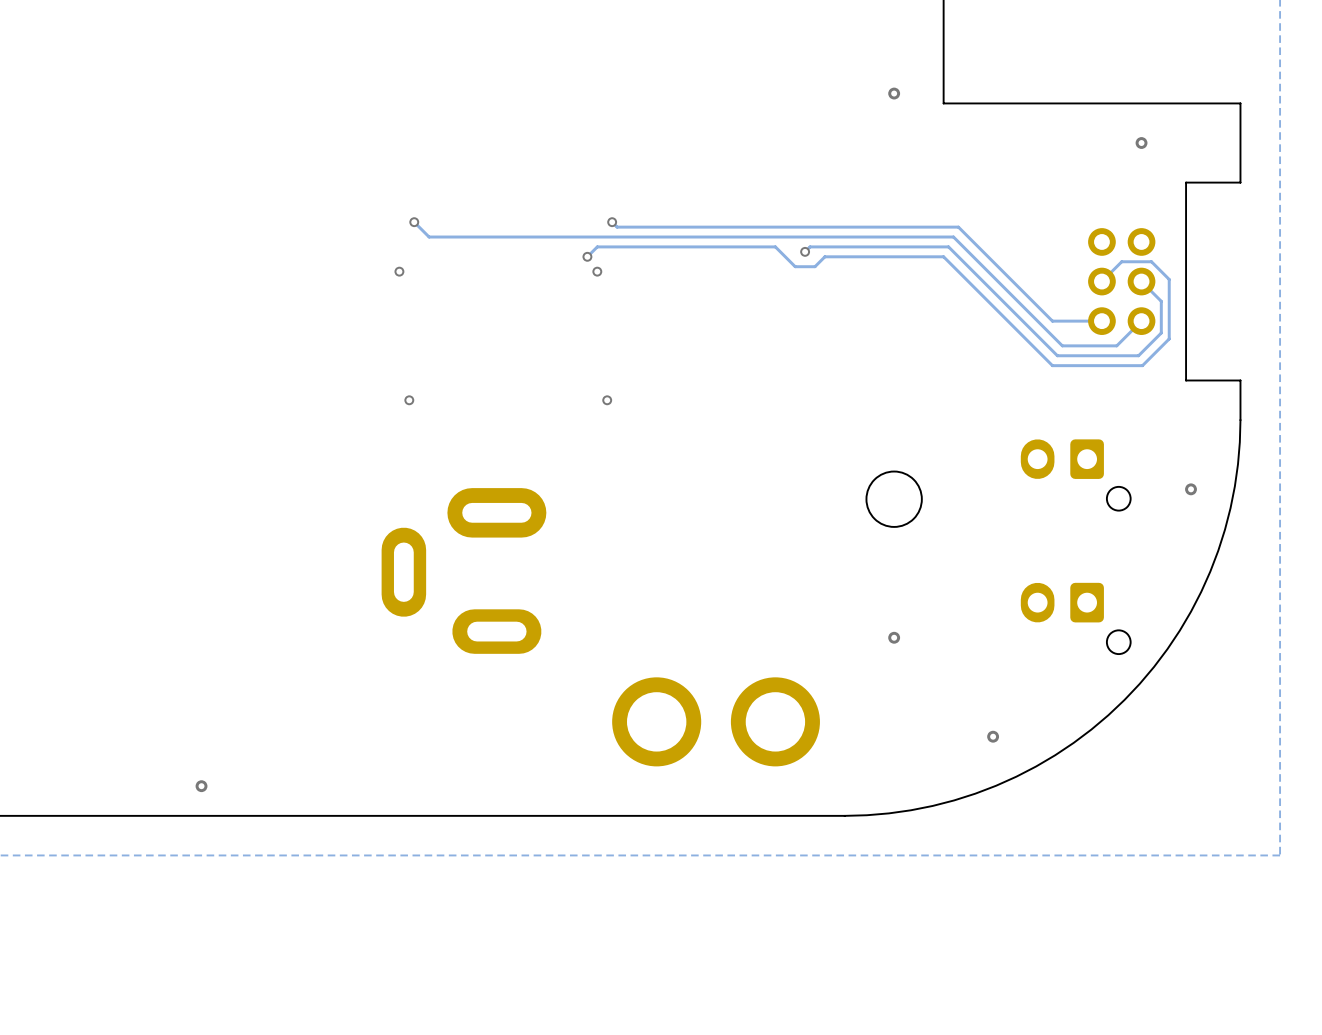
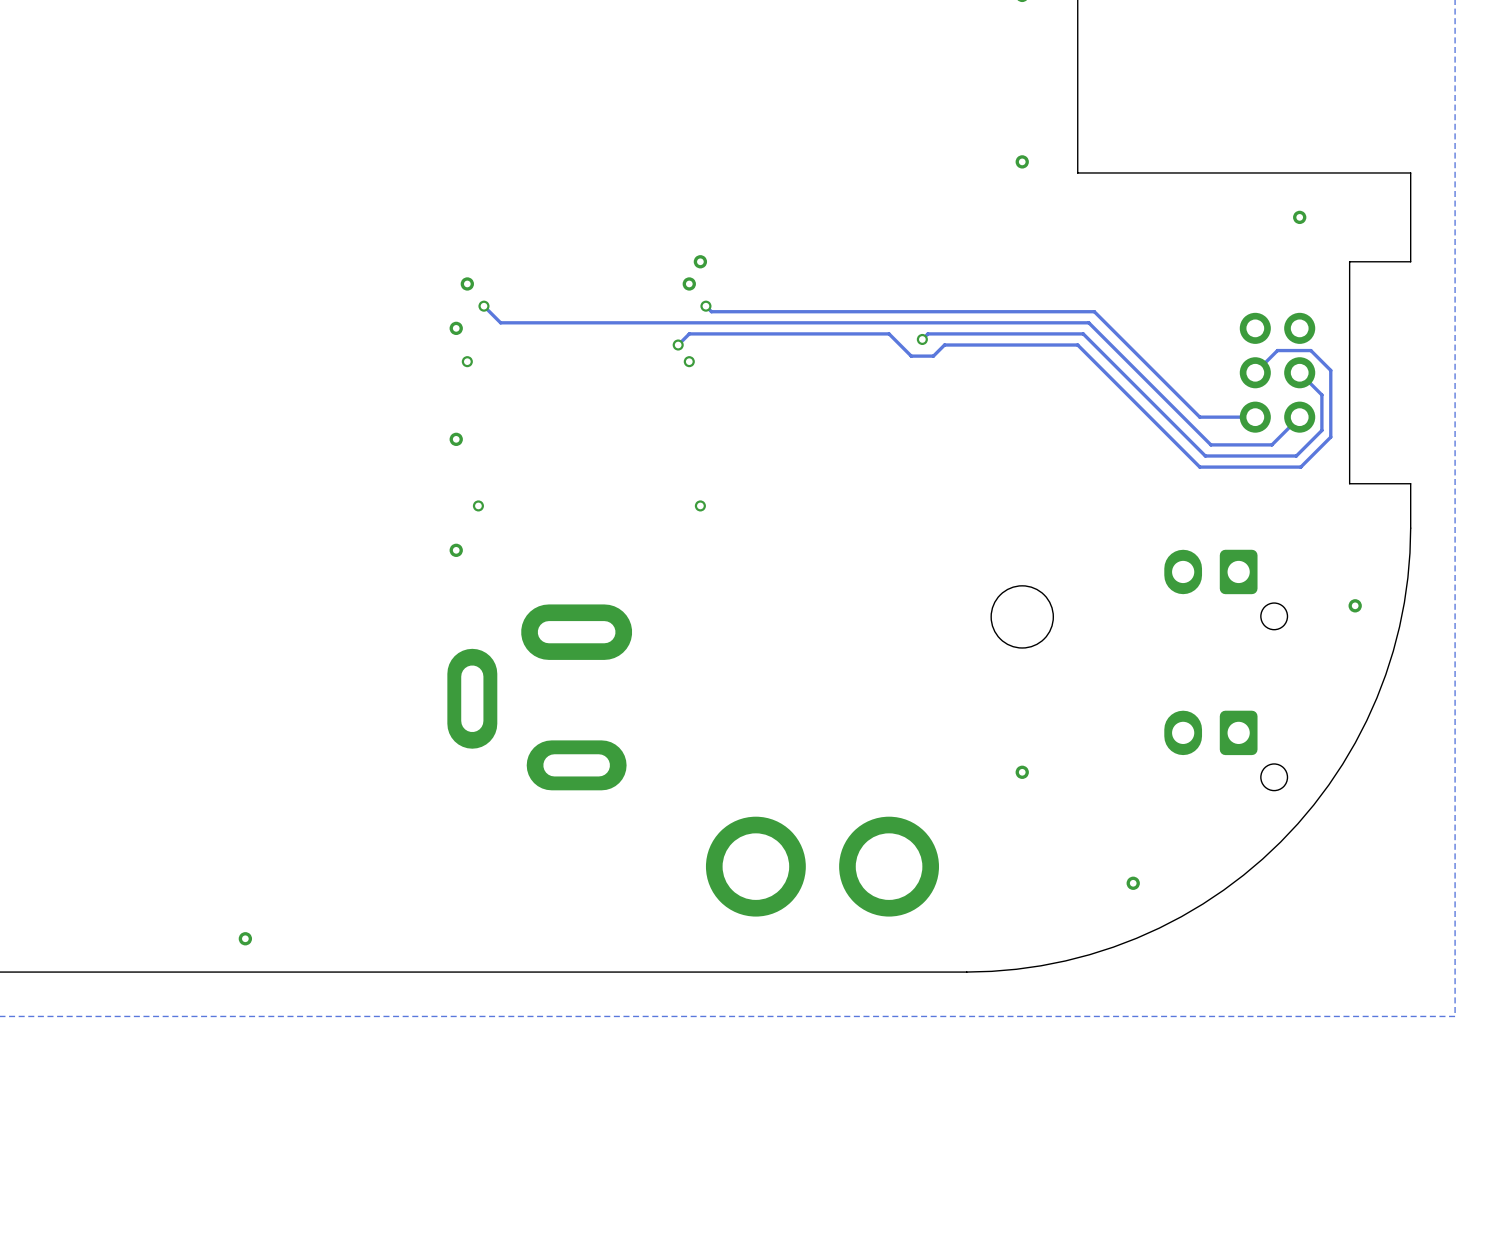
via: none -> (700, 261)
via: none -> (467, 283)
via: none -> (689, 283)
via: none -> (456, 328)
via: none -> (456, 439)
via: none -> (456, 550)

